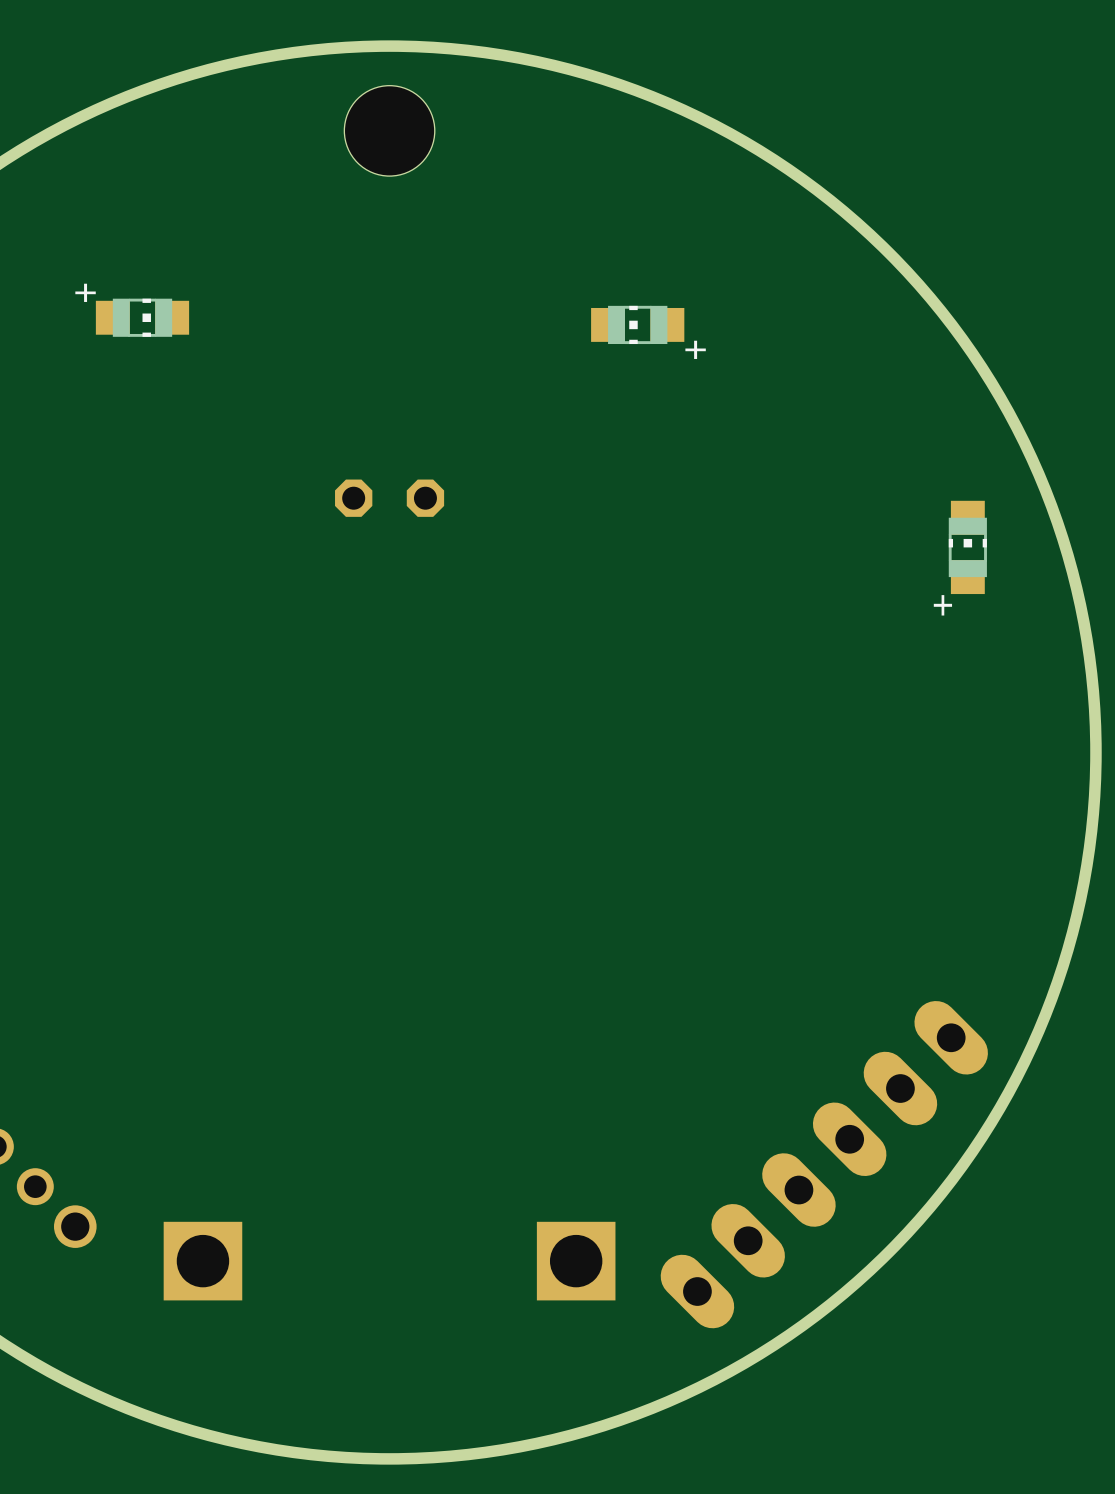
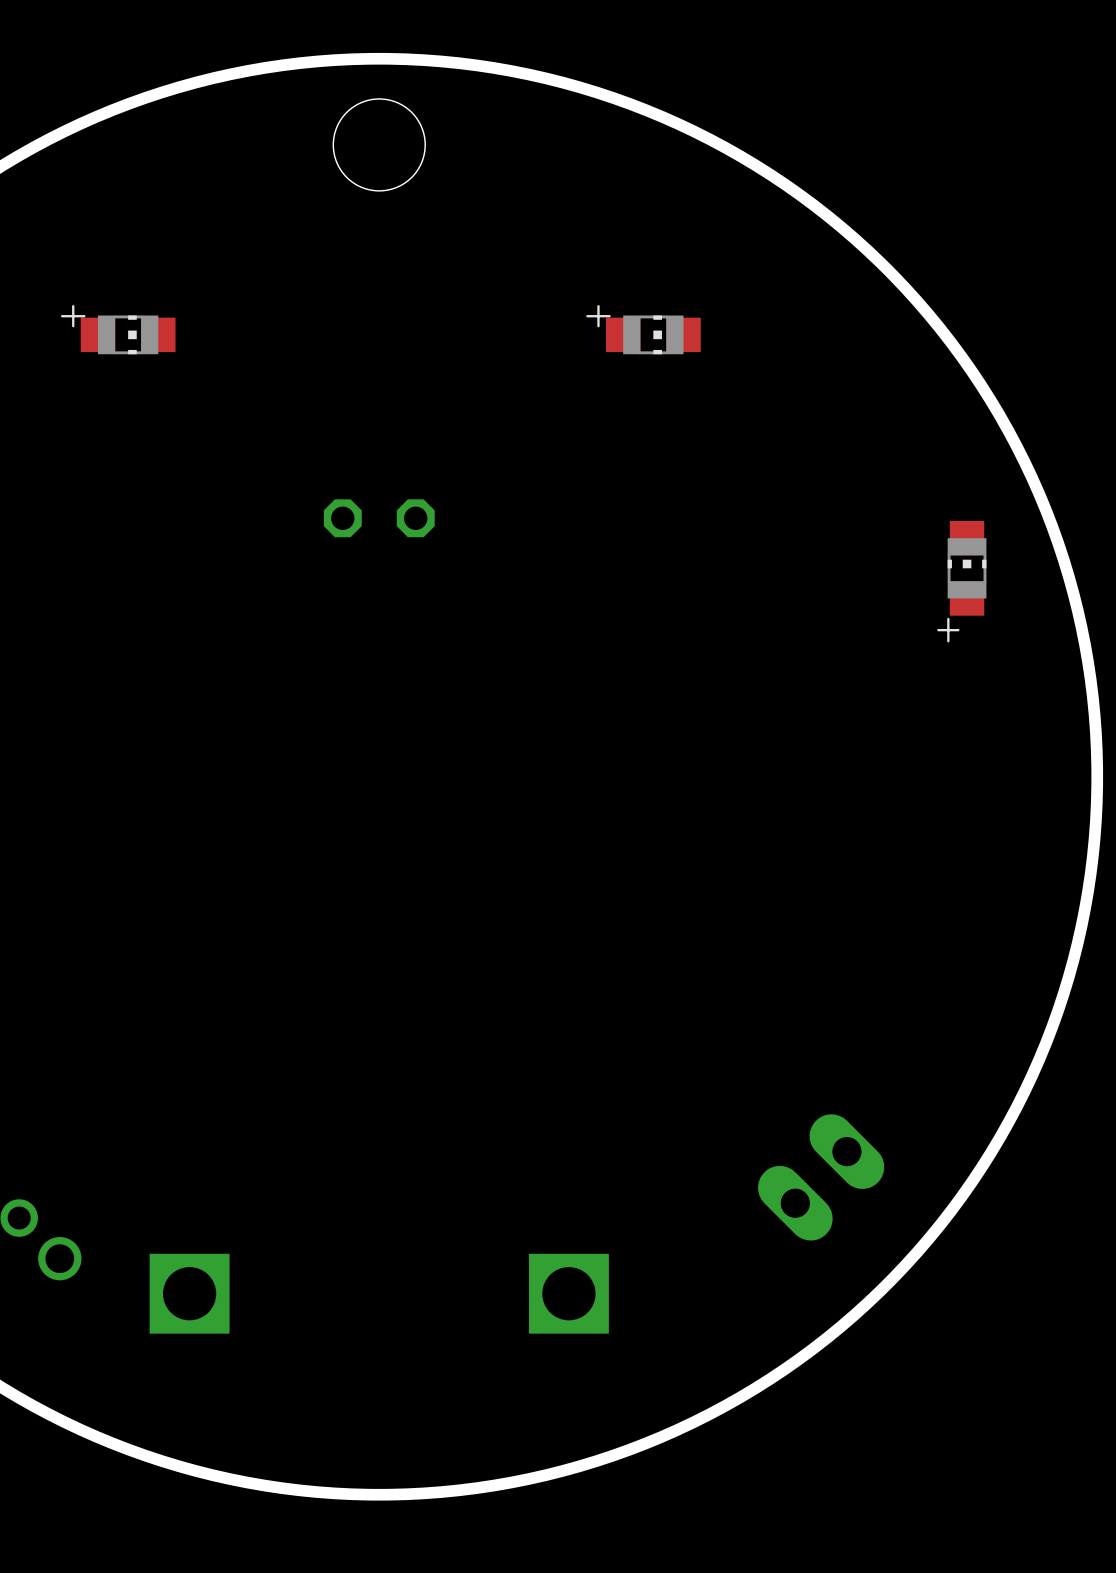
part footprint: [591, 305, 685, 345] -> [605, 315, 701, 355]
part footprint: [660, 1001, 988, 1329] -> [757, 1114, 885, 1241]

